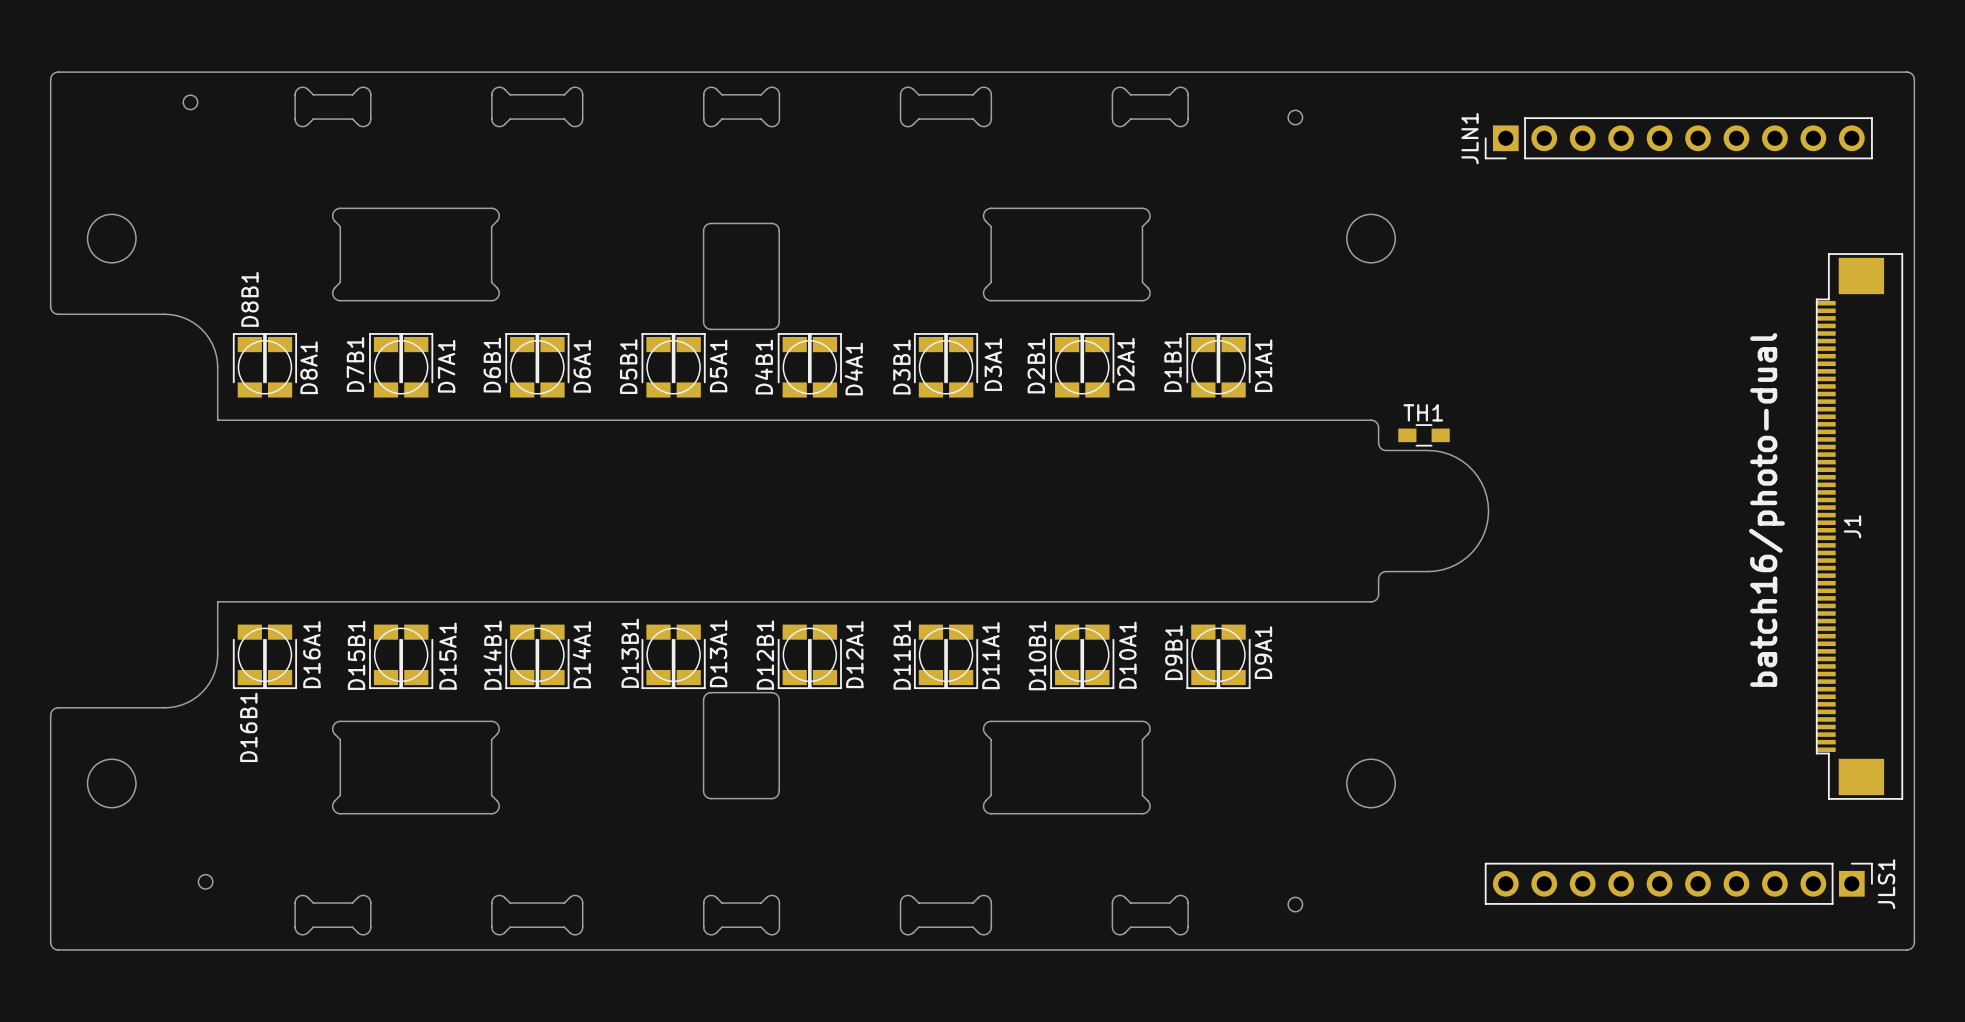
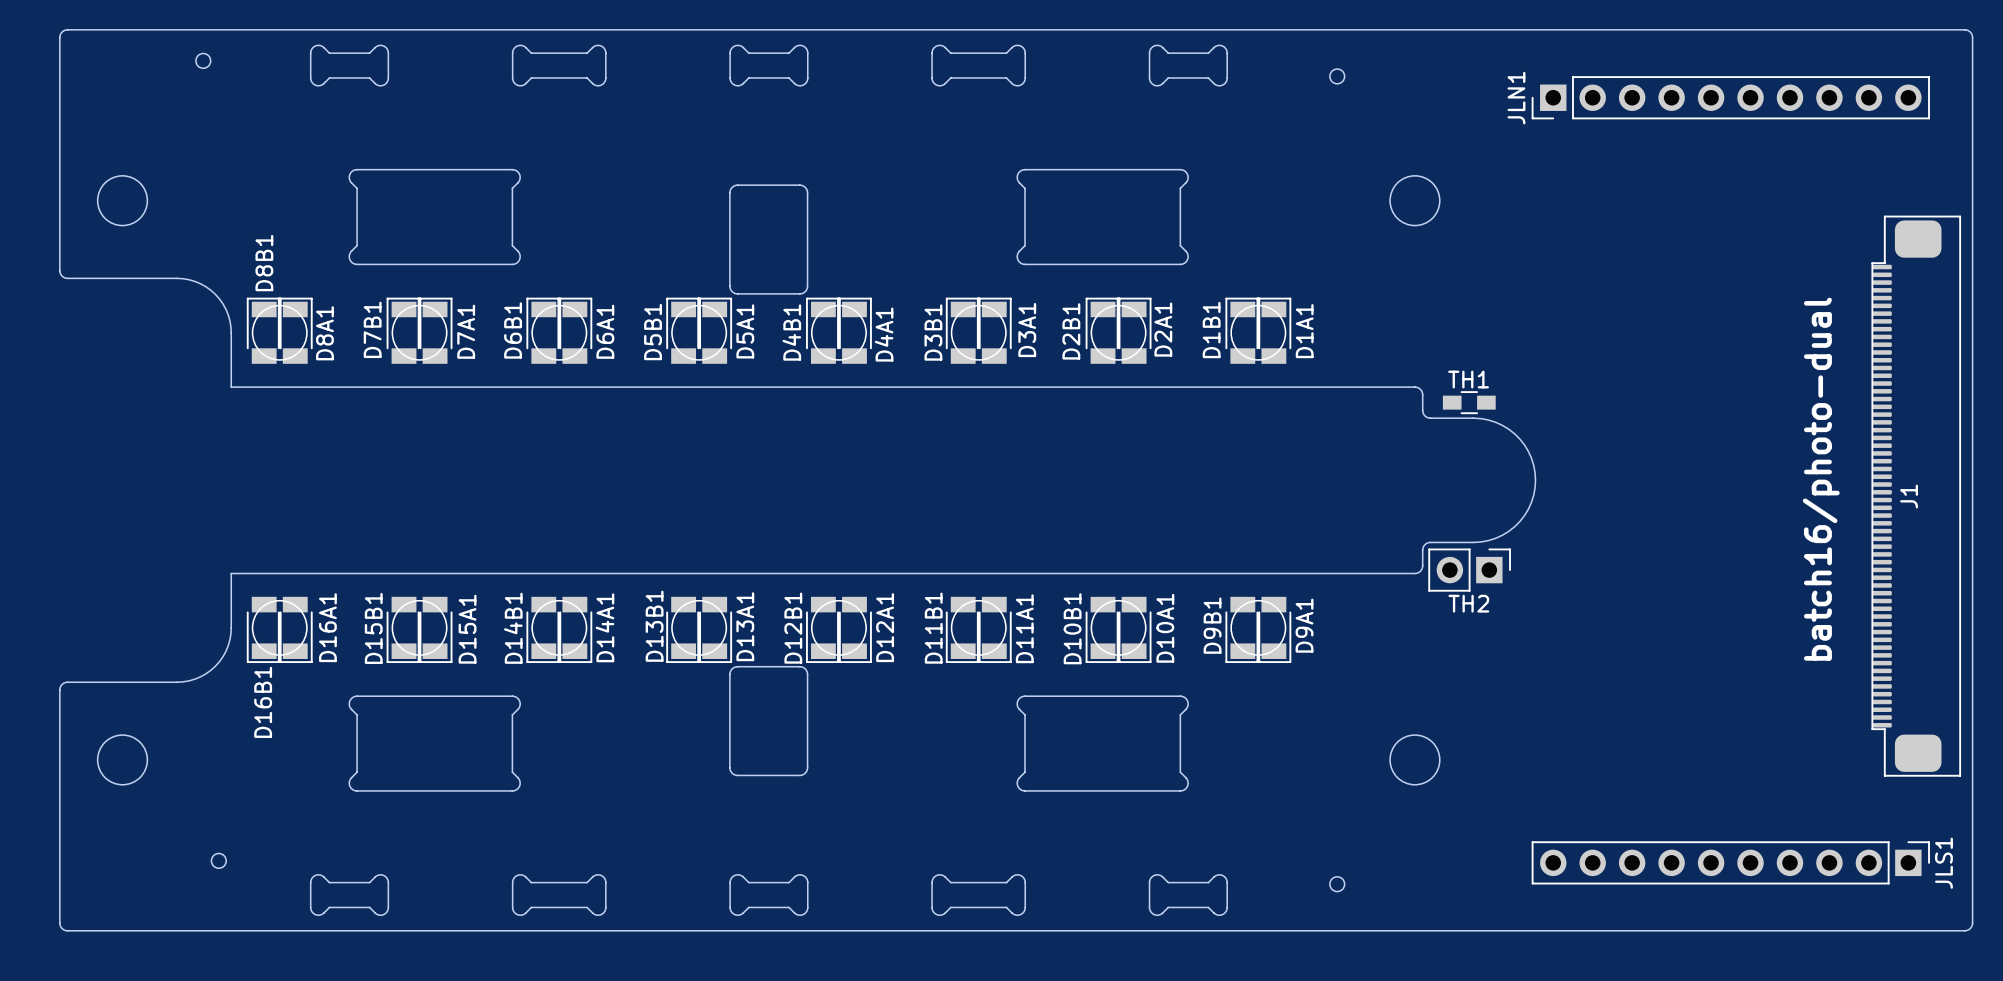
J1 footprint: [1815, 253, 1904, 800] -> [1871, 215, 1962, 777]
TH2: none -> (1469, 570)

